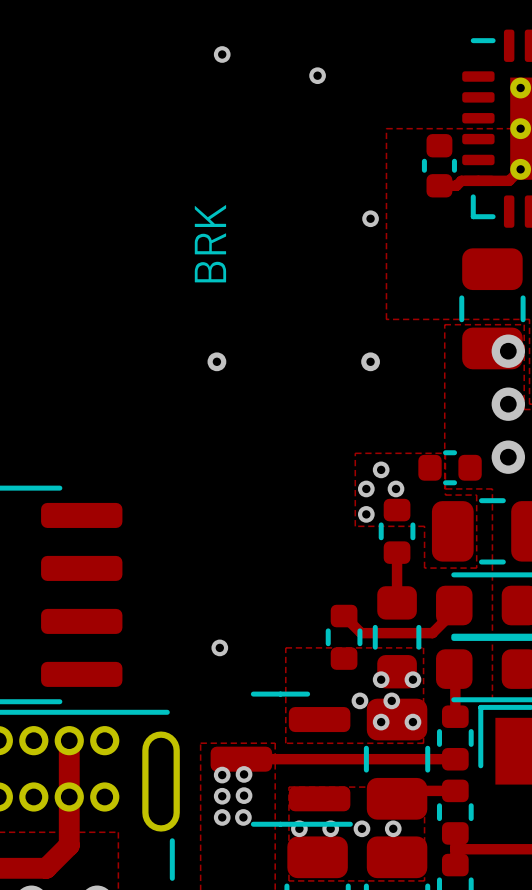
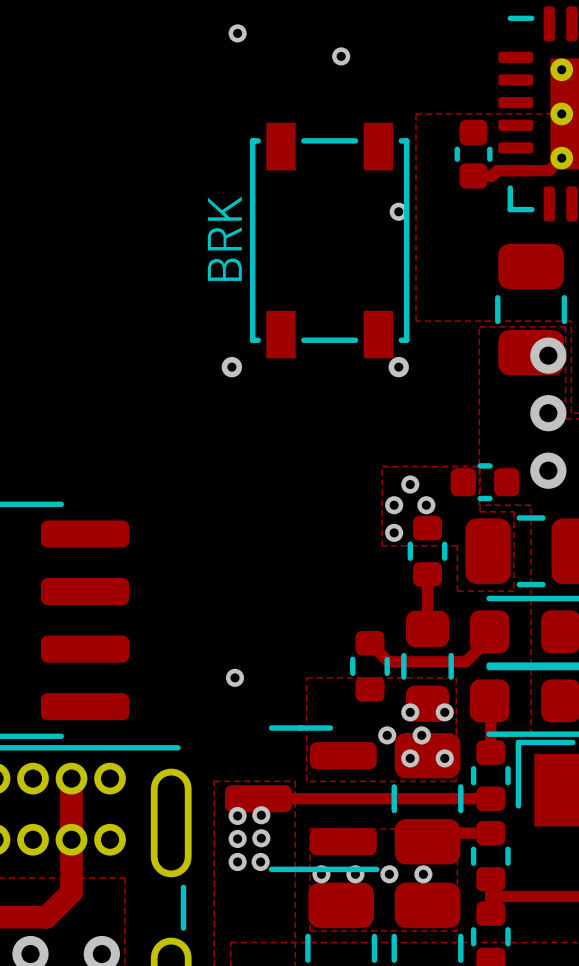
part: none -> (329, 240)

